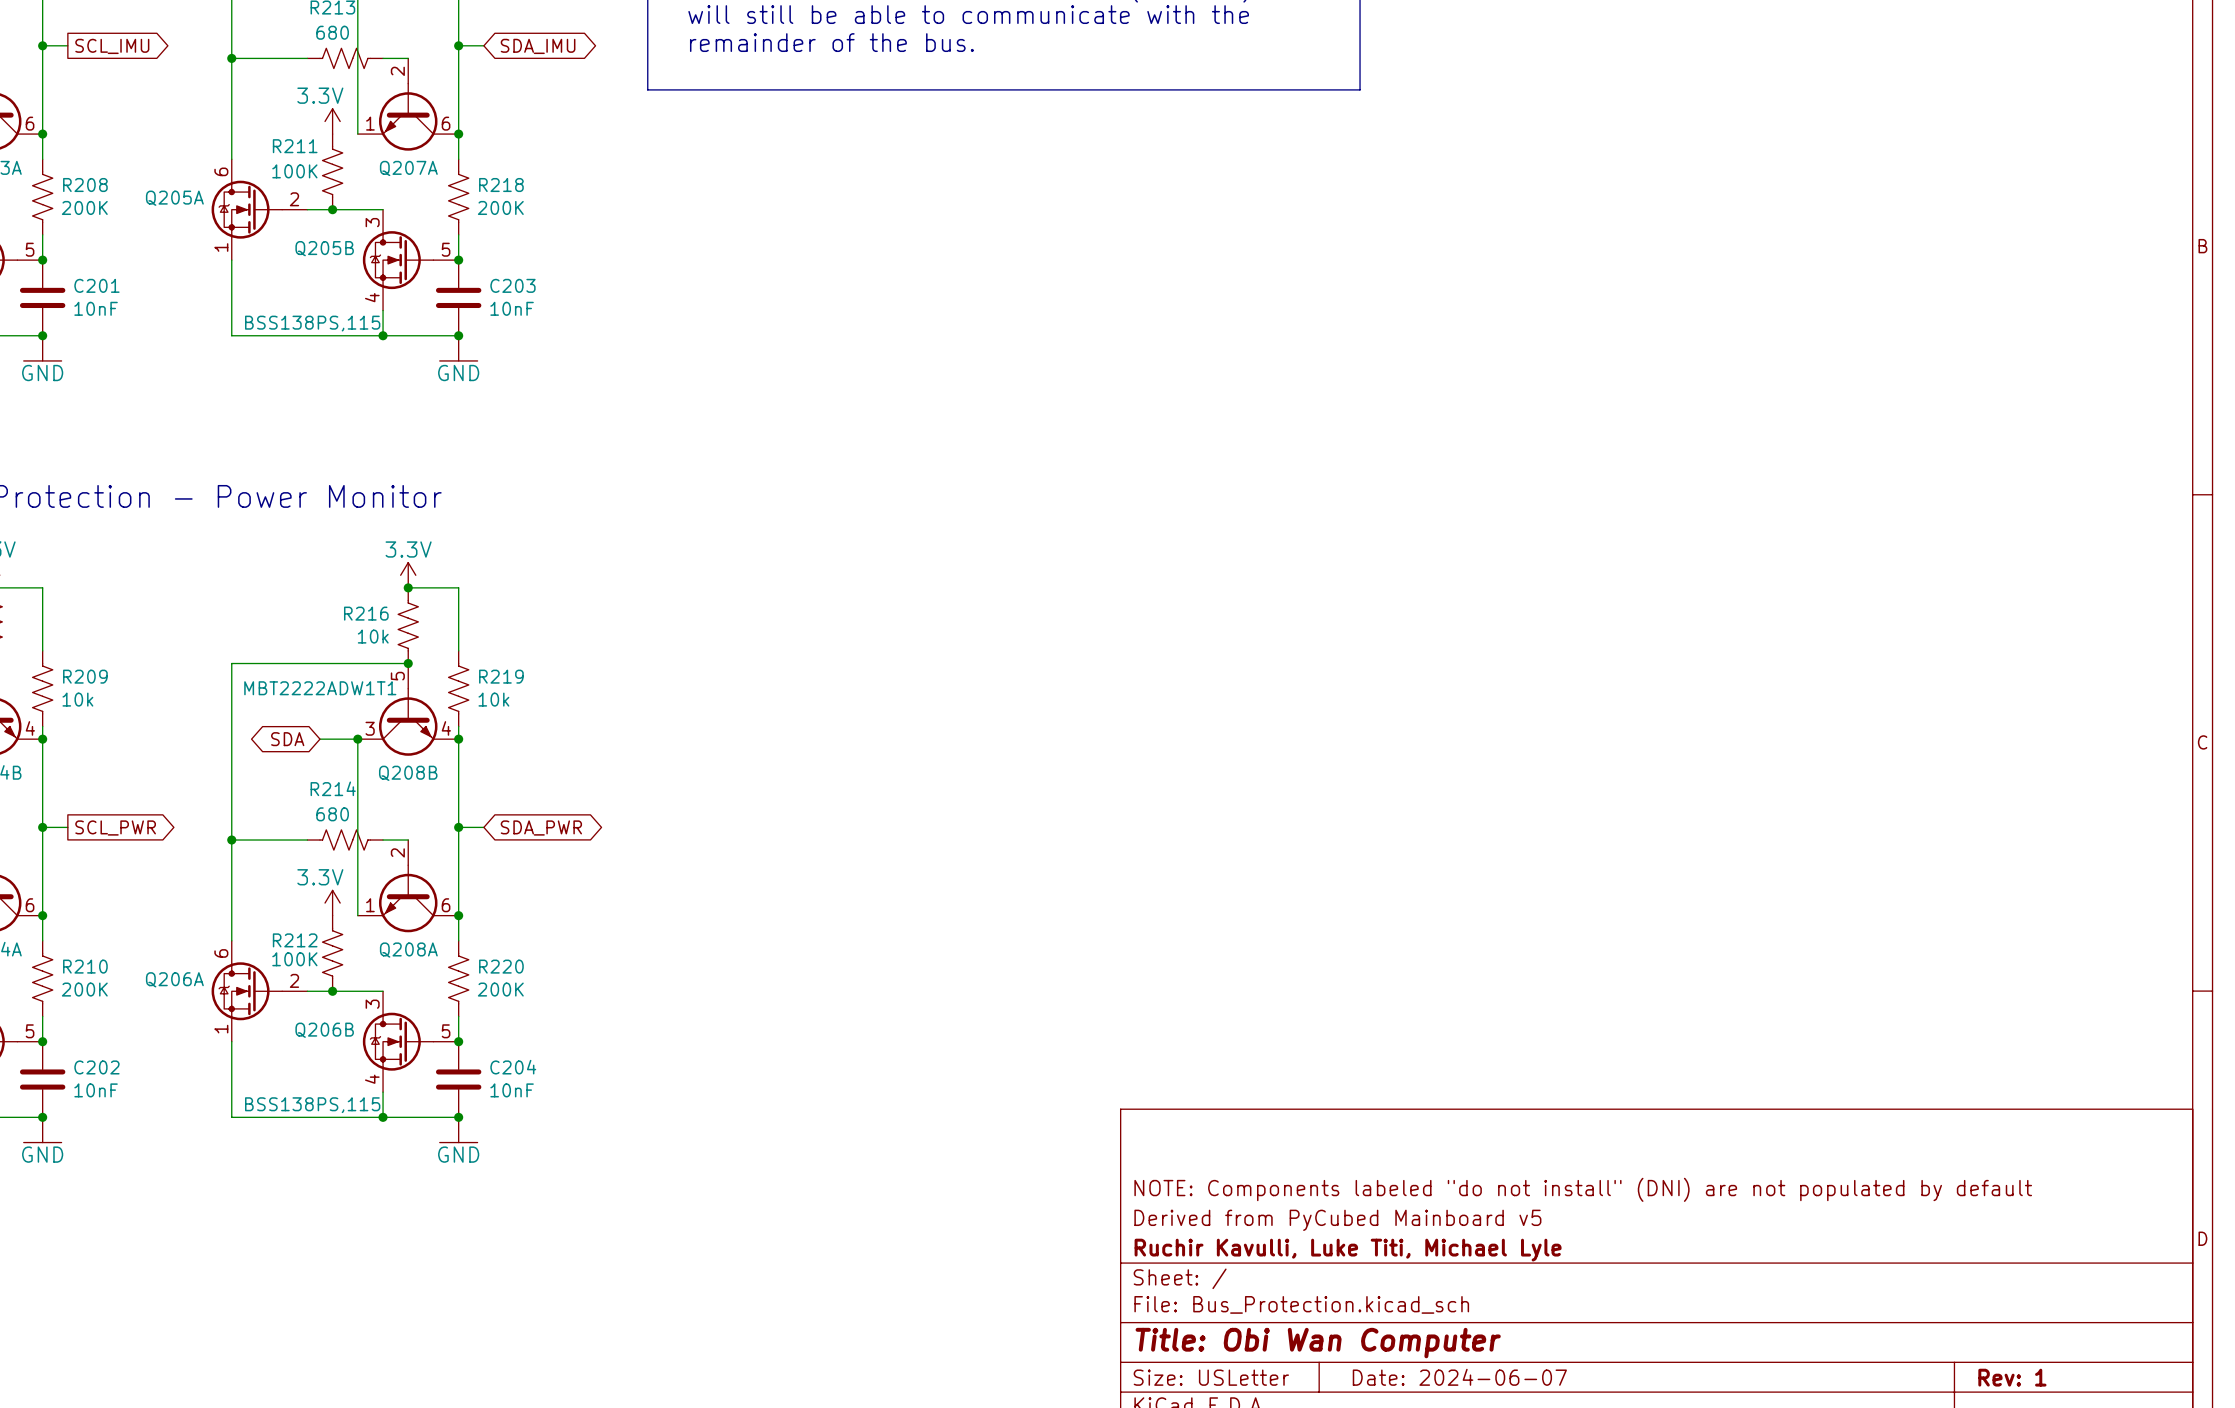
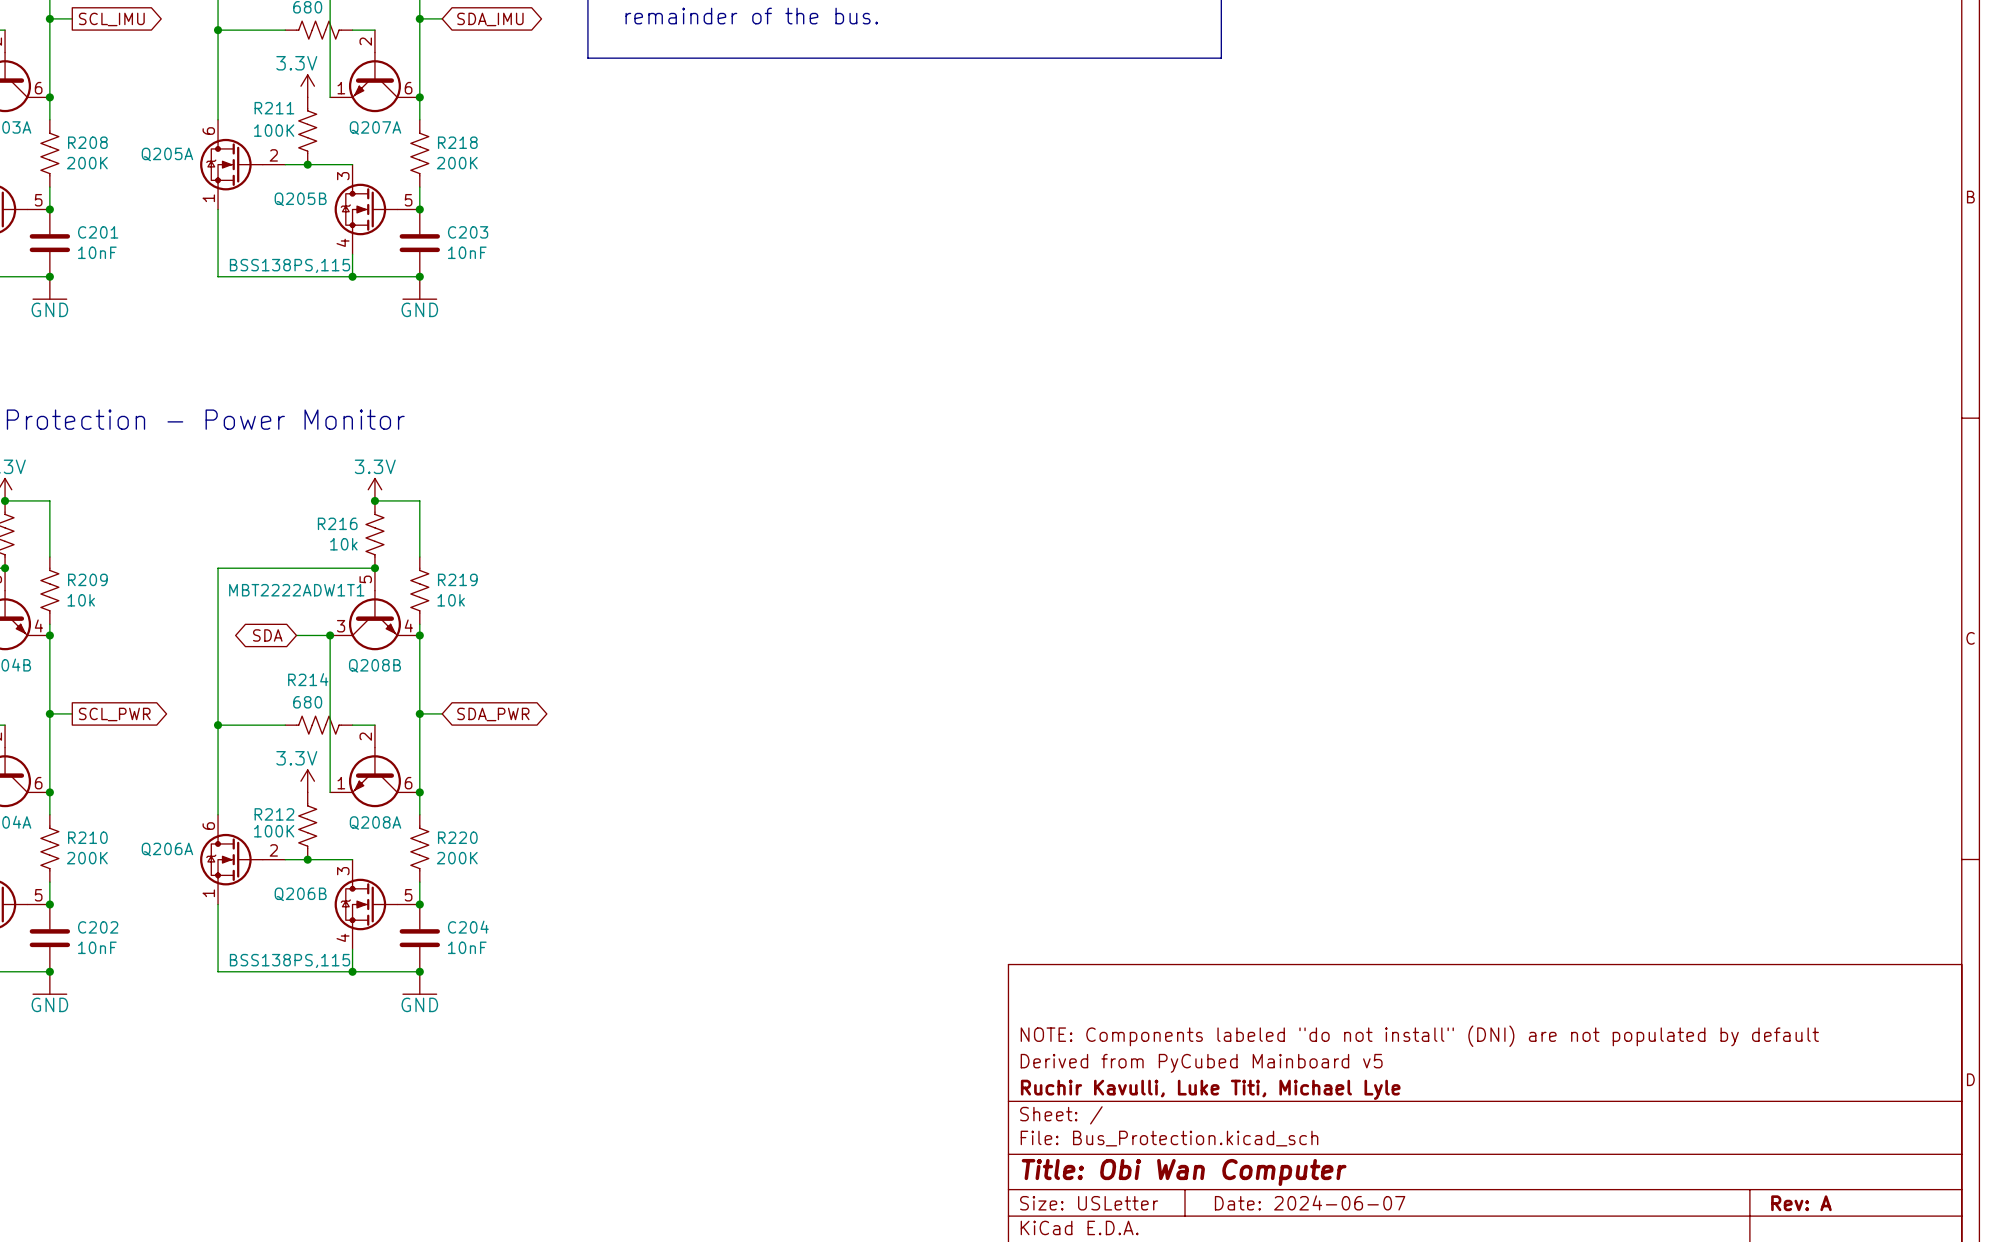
title block: Rev: 1 (2012, 1377) -> Rev: A (1801, 1203)

